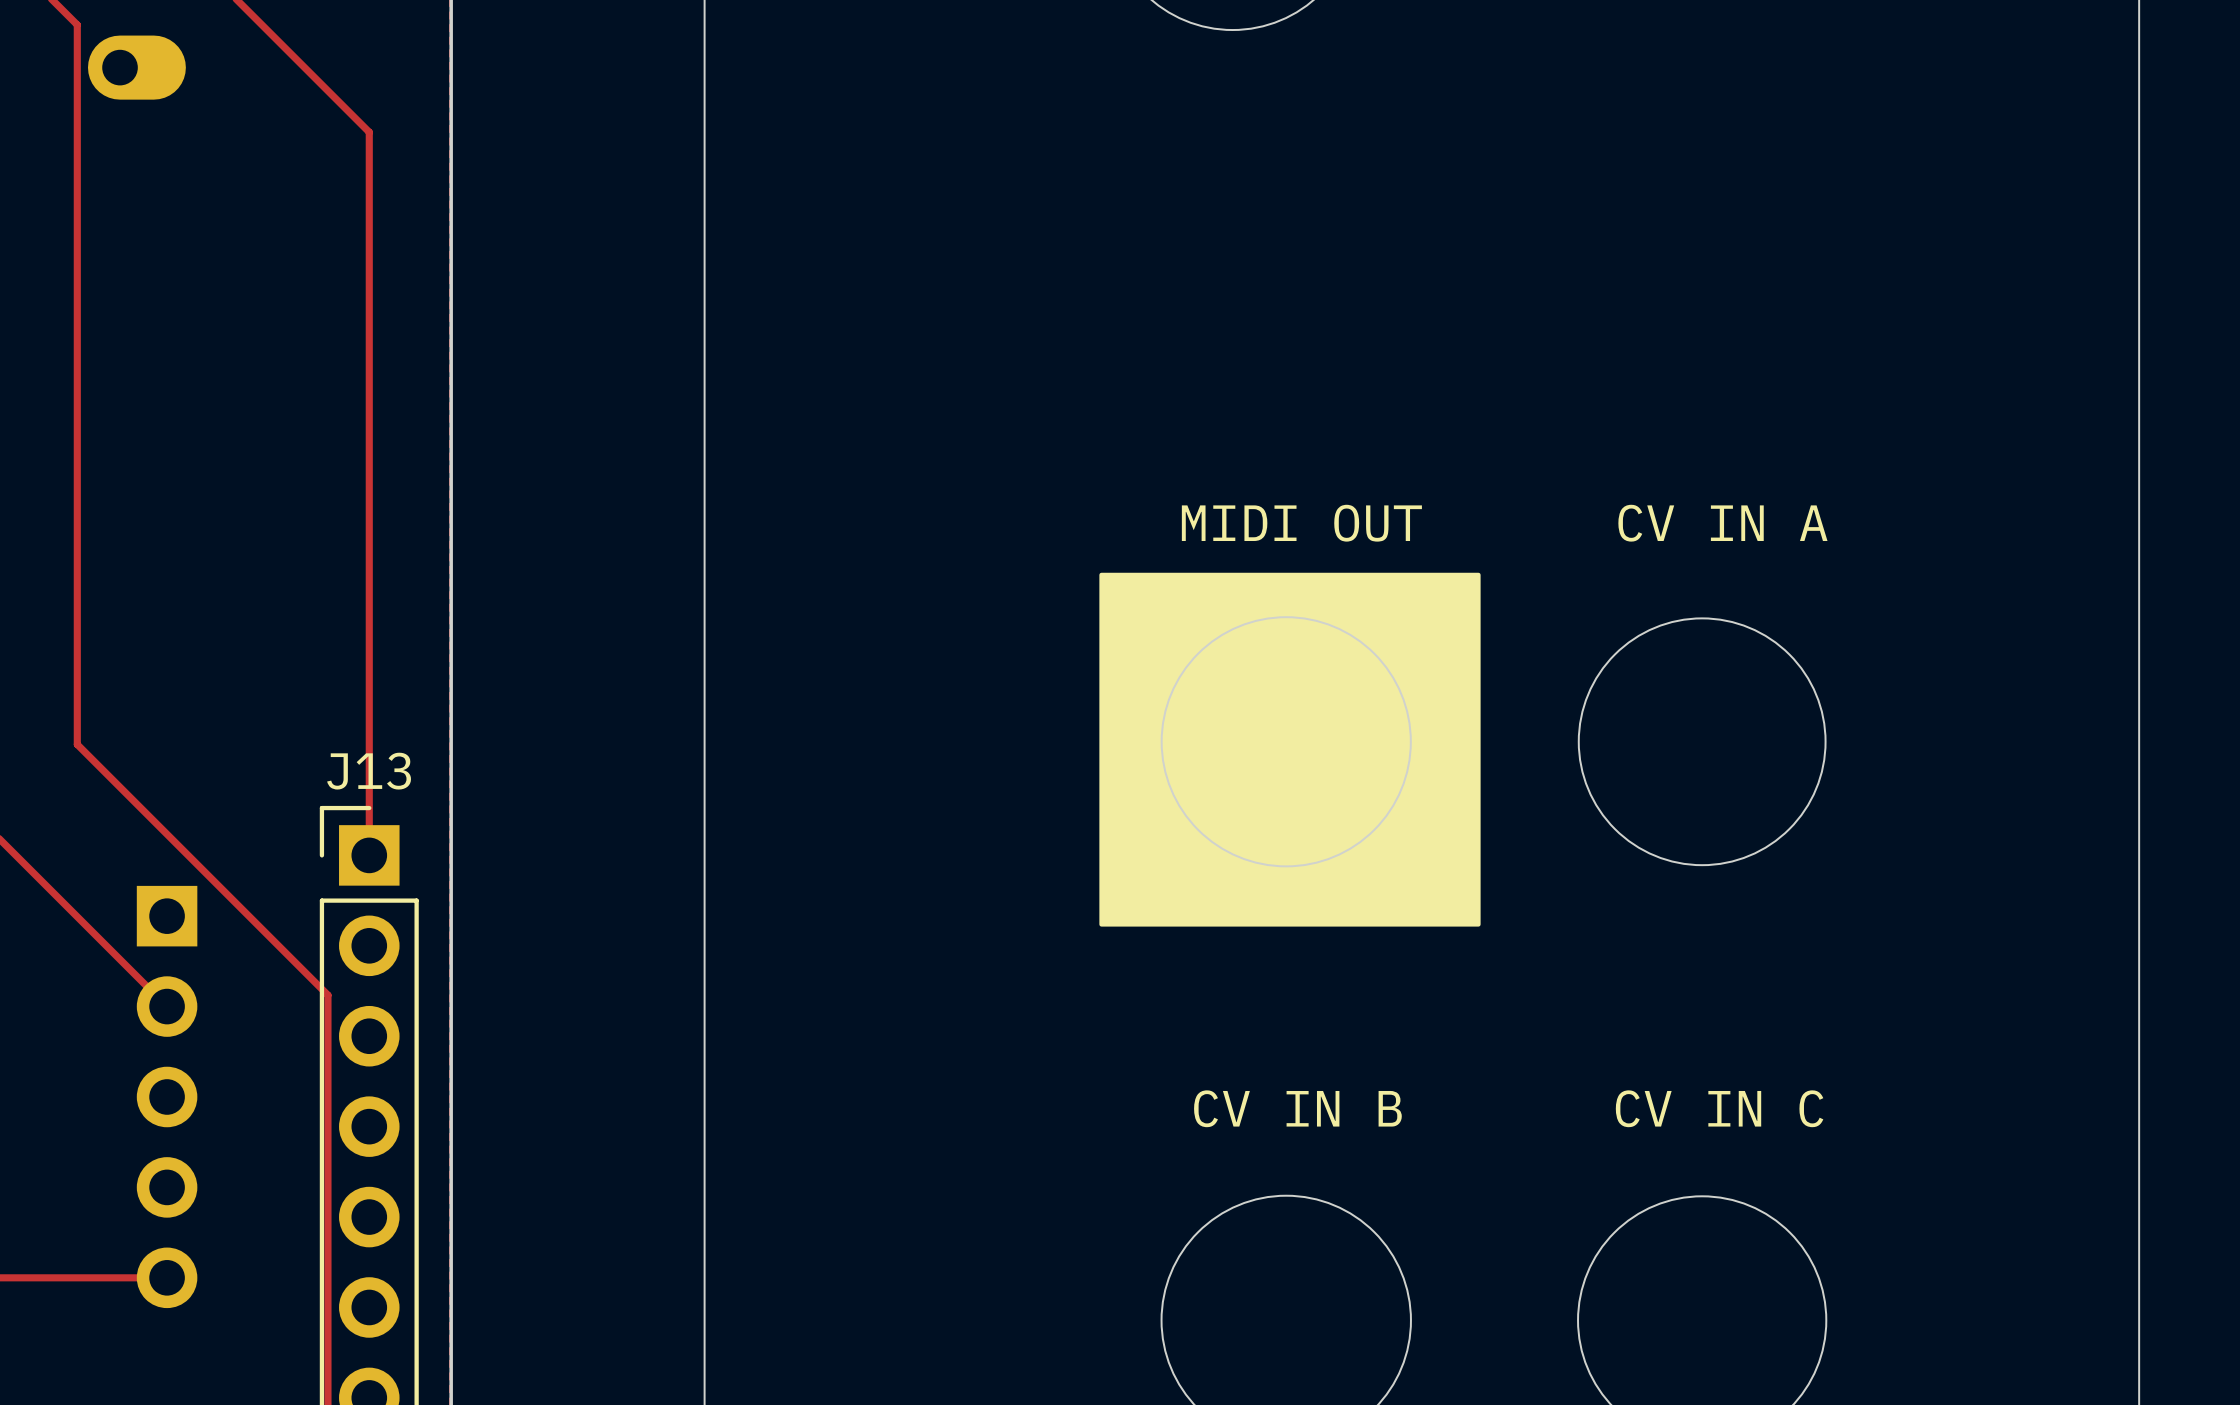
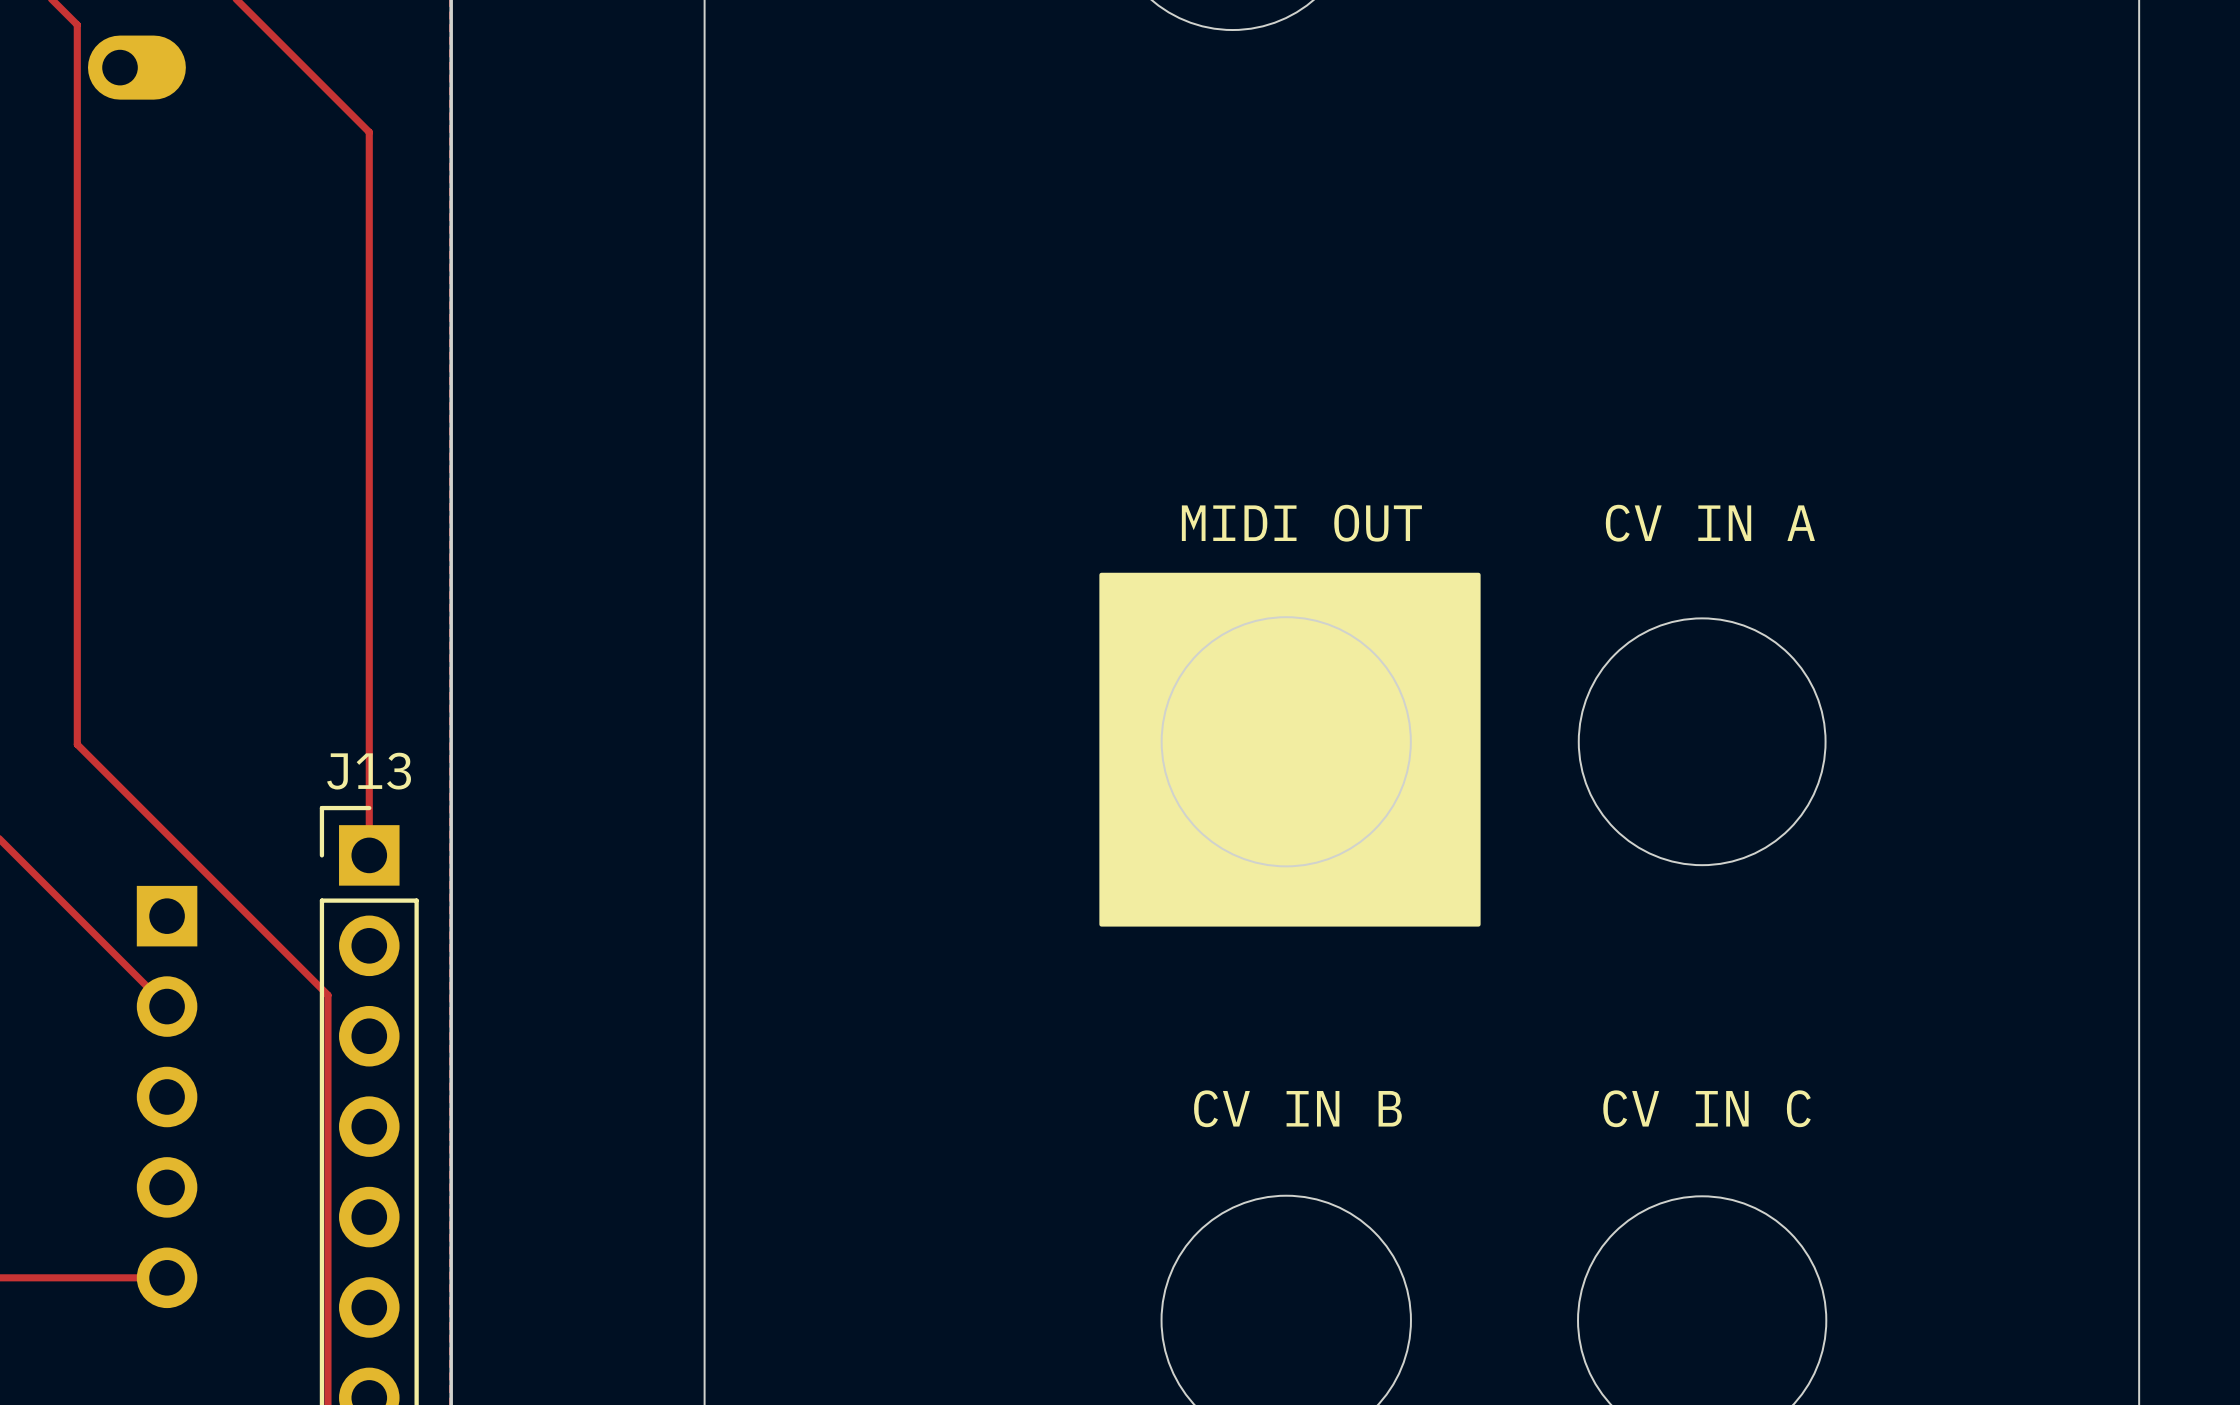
text position: CV IN A (1722, 523) -> CV IN A (1710, 523)
text position: CV IN C (1719, 1108) -> CV IN C (1707, 1108)

